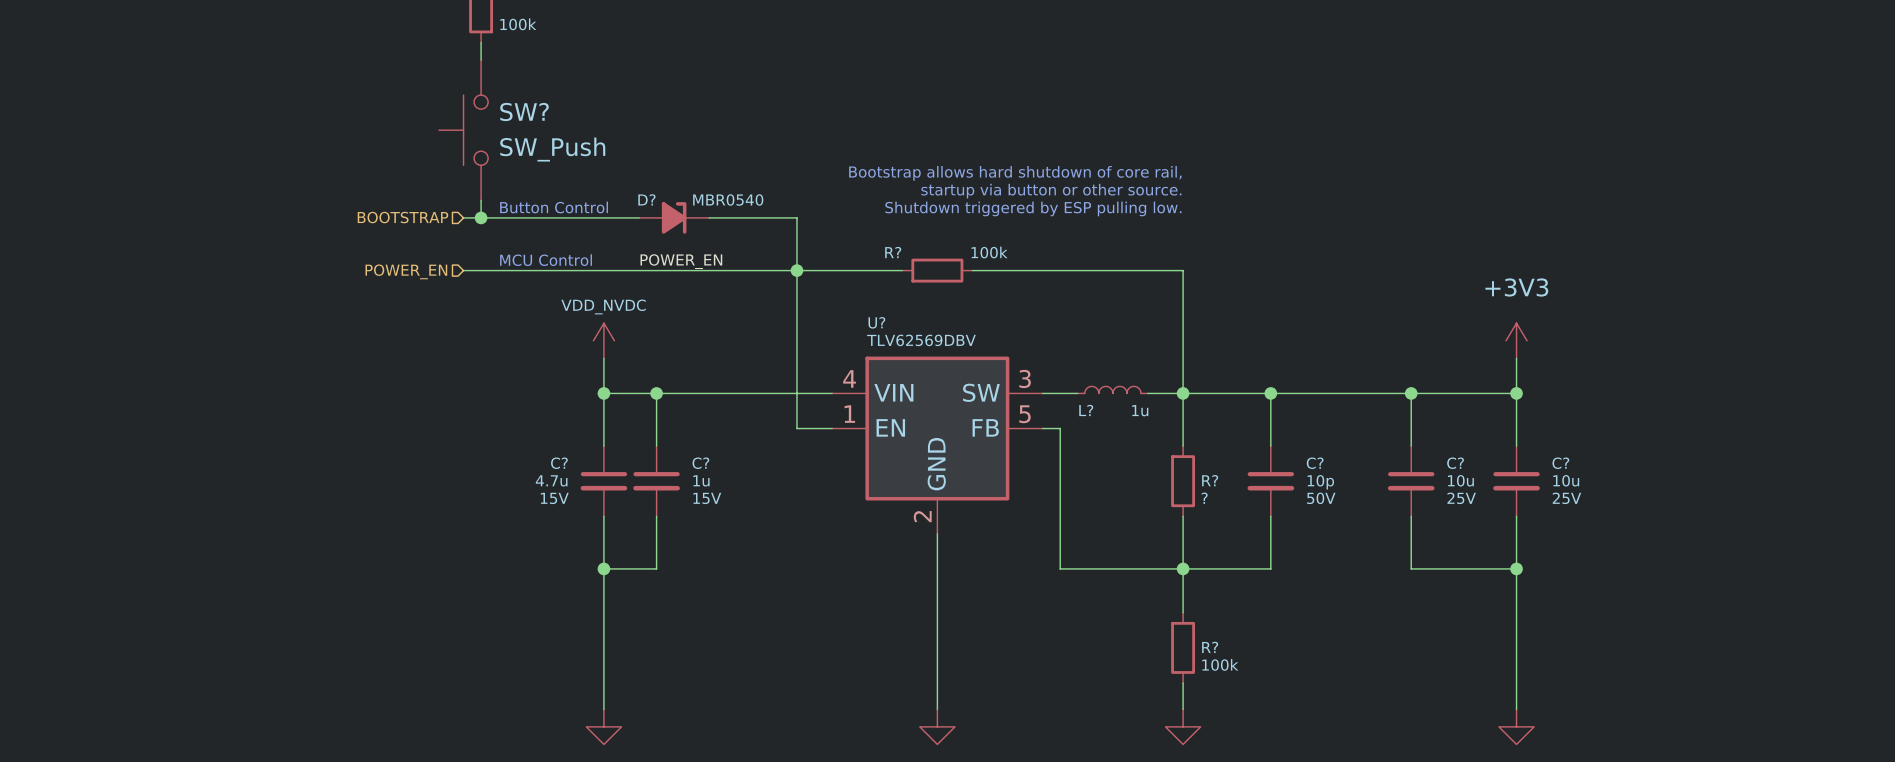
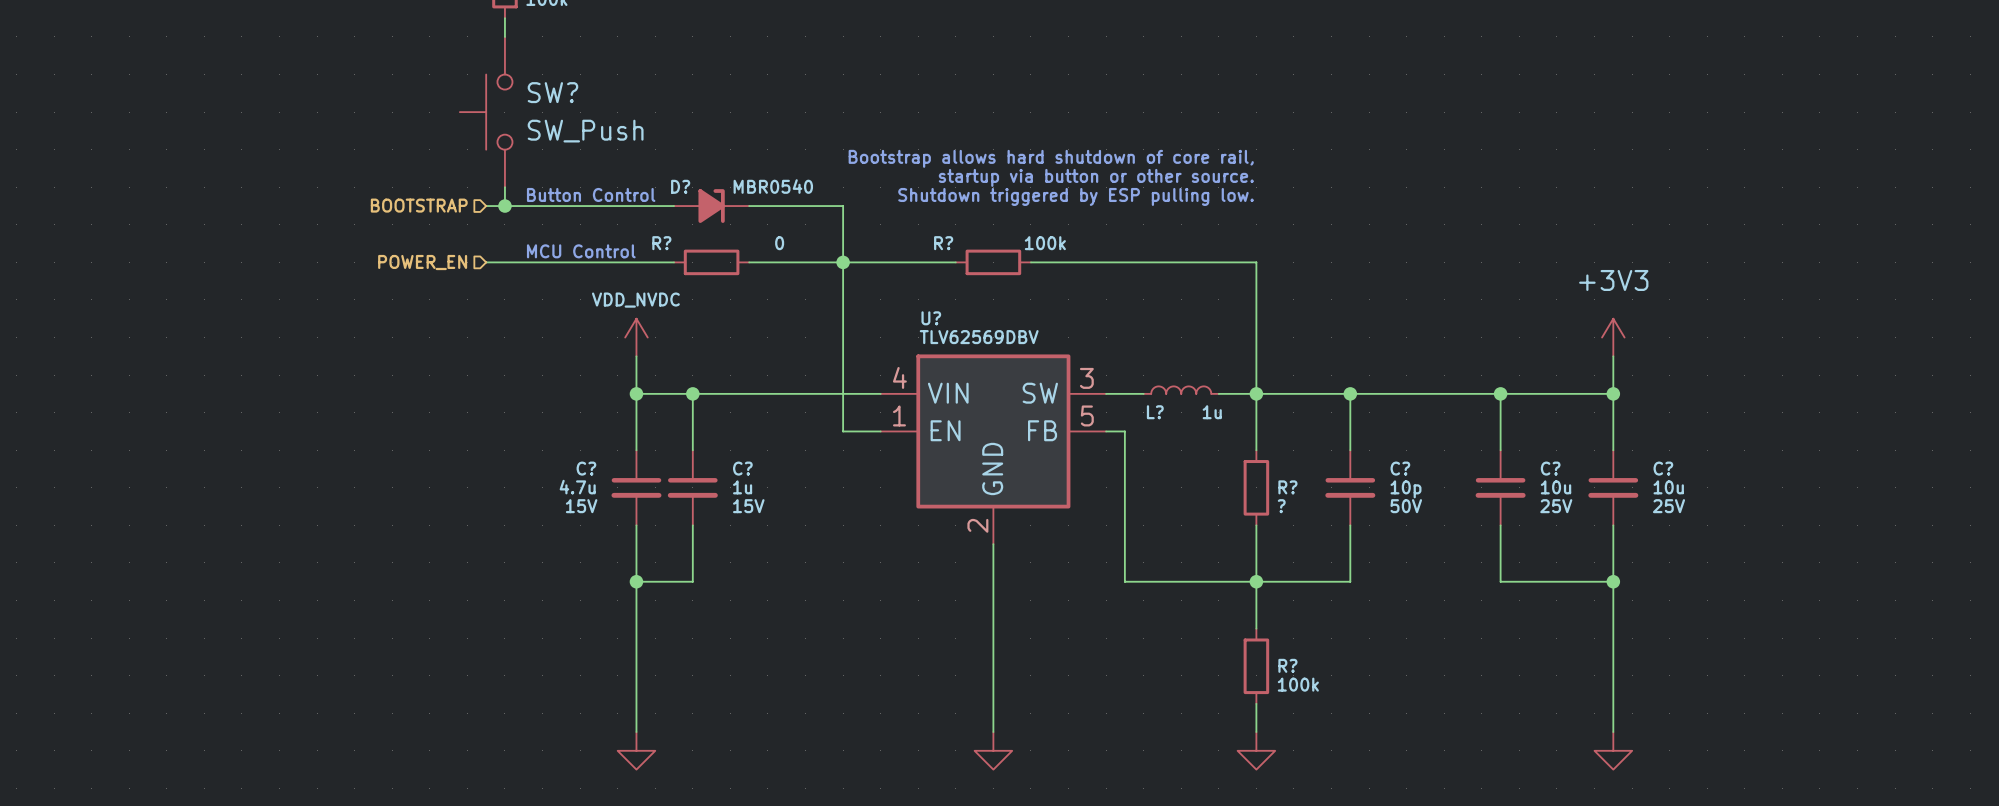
label: POWER_EN (681, 261) -> none
wire: (639, 270) (709, 270) -> none
R?: none -> 0 (711, 262)

